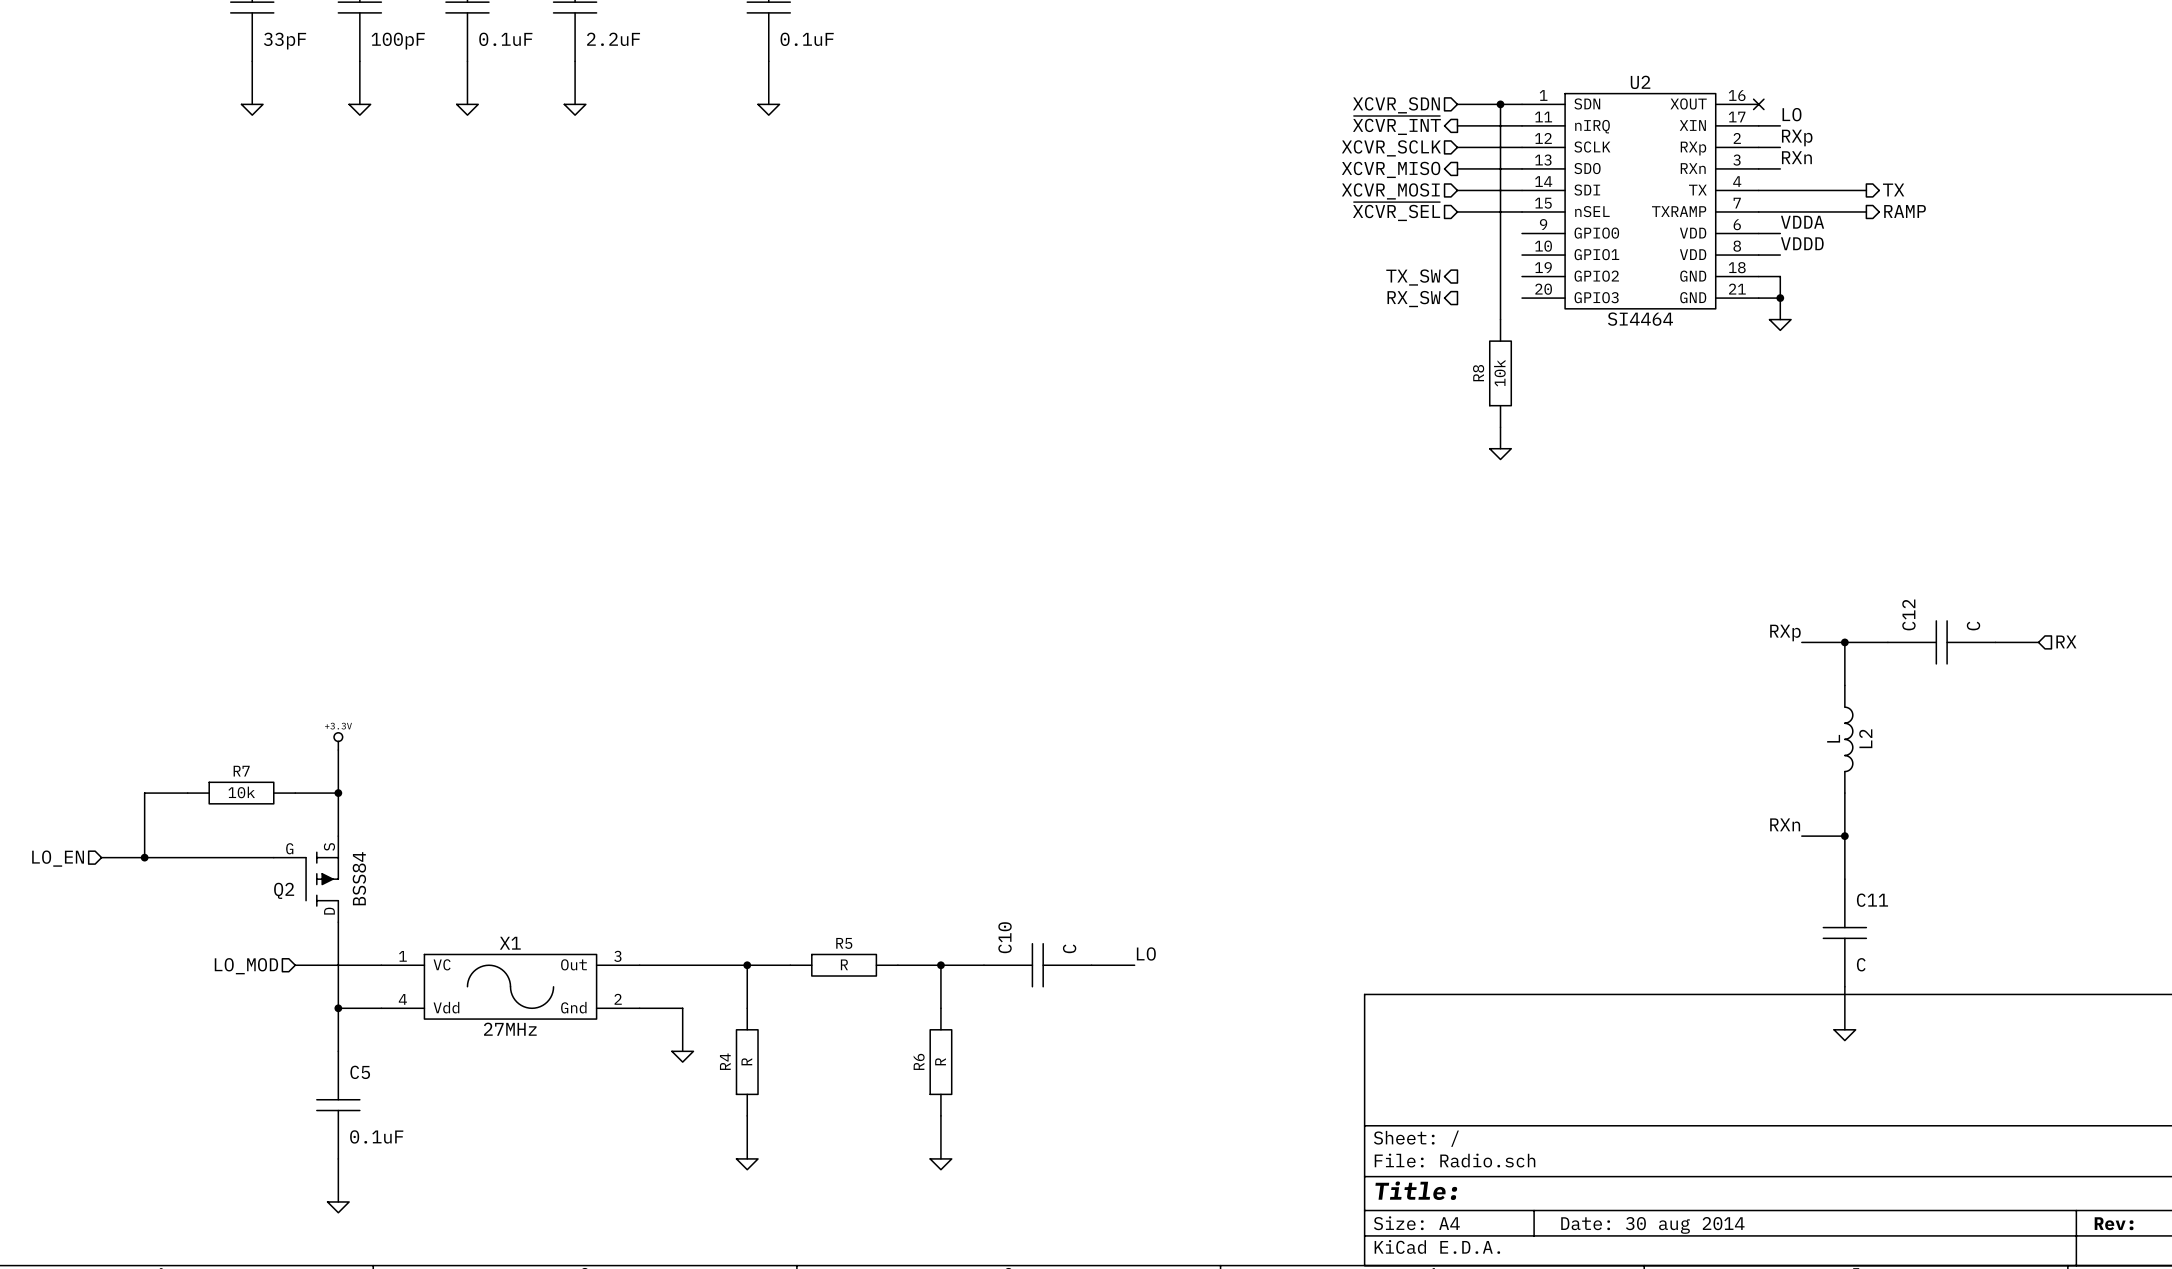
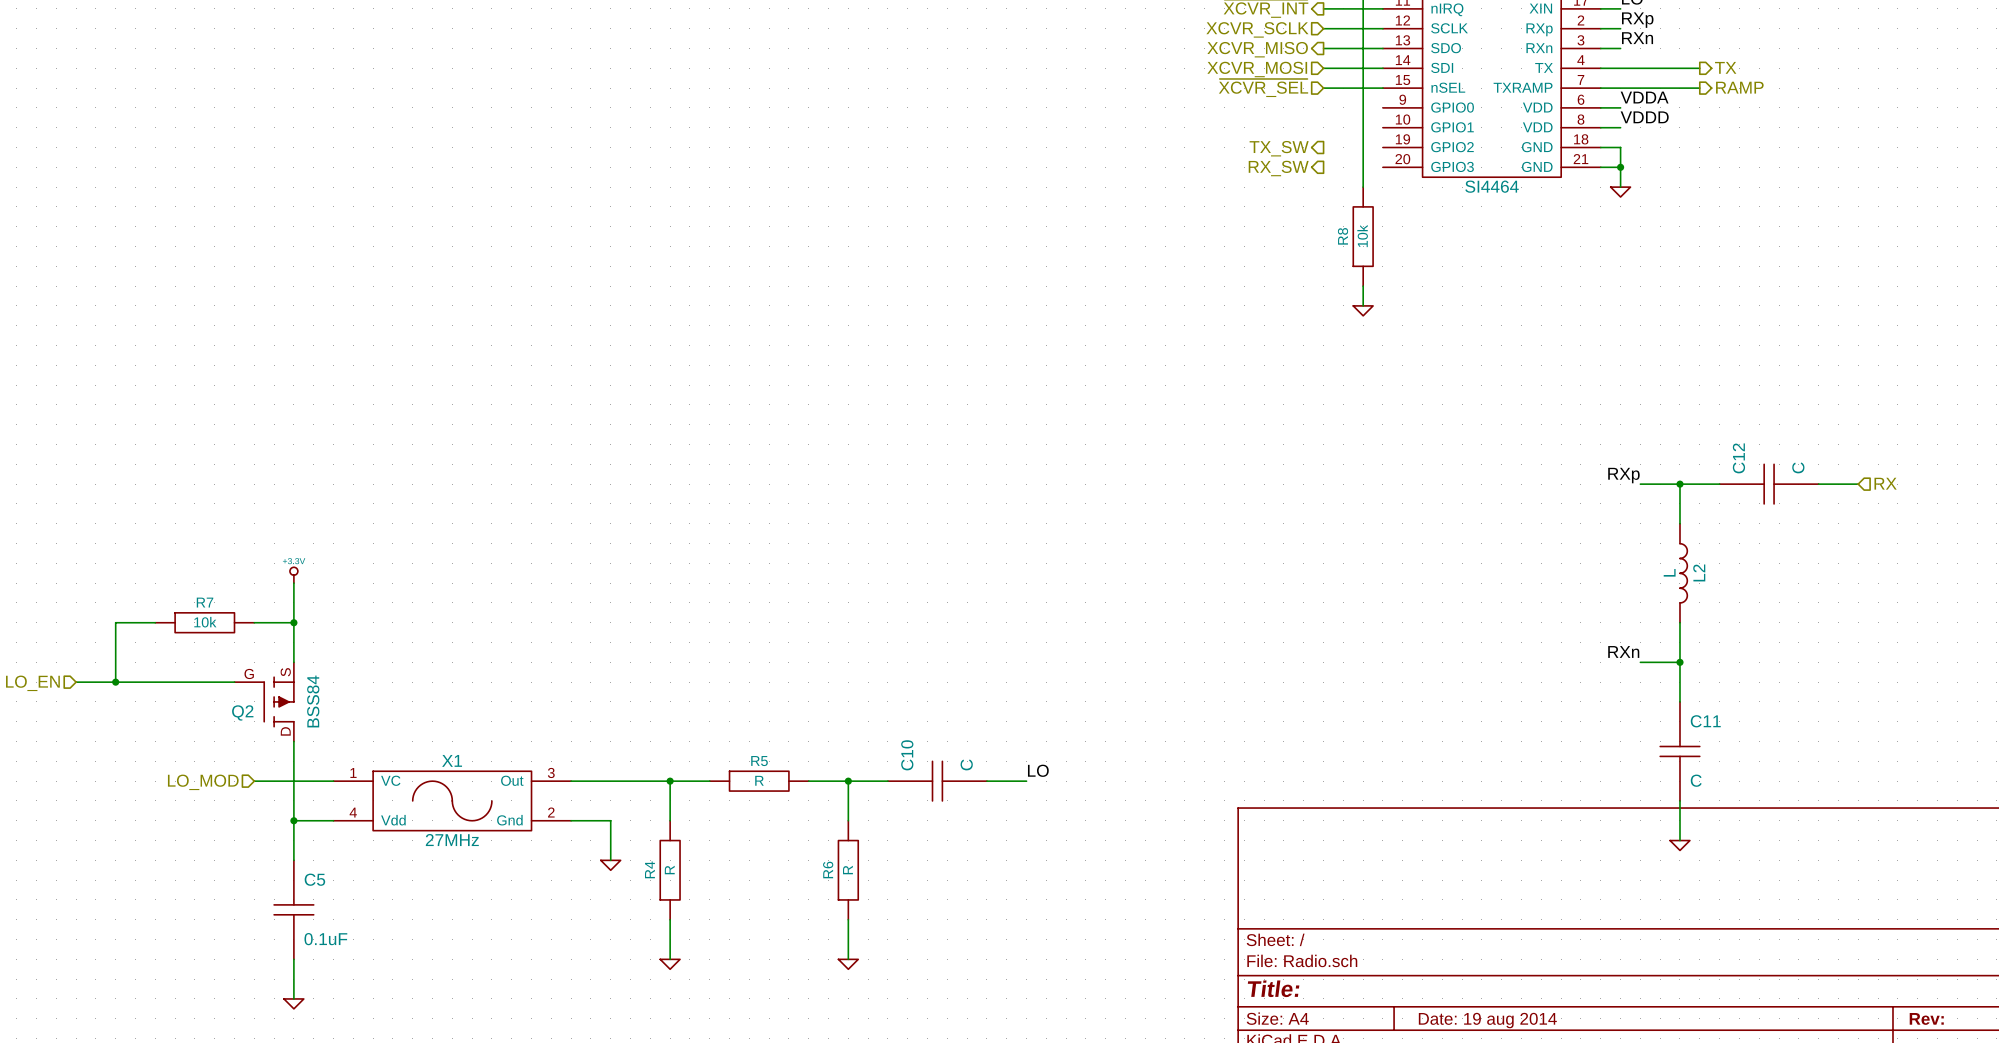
title block: Date: 30 aug 2014 (1652, 1225) -> Date: 19 aug 2014 (1487, 1020)

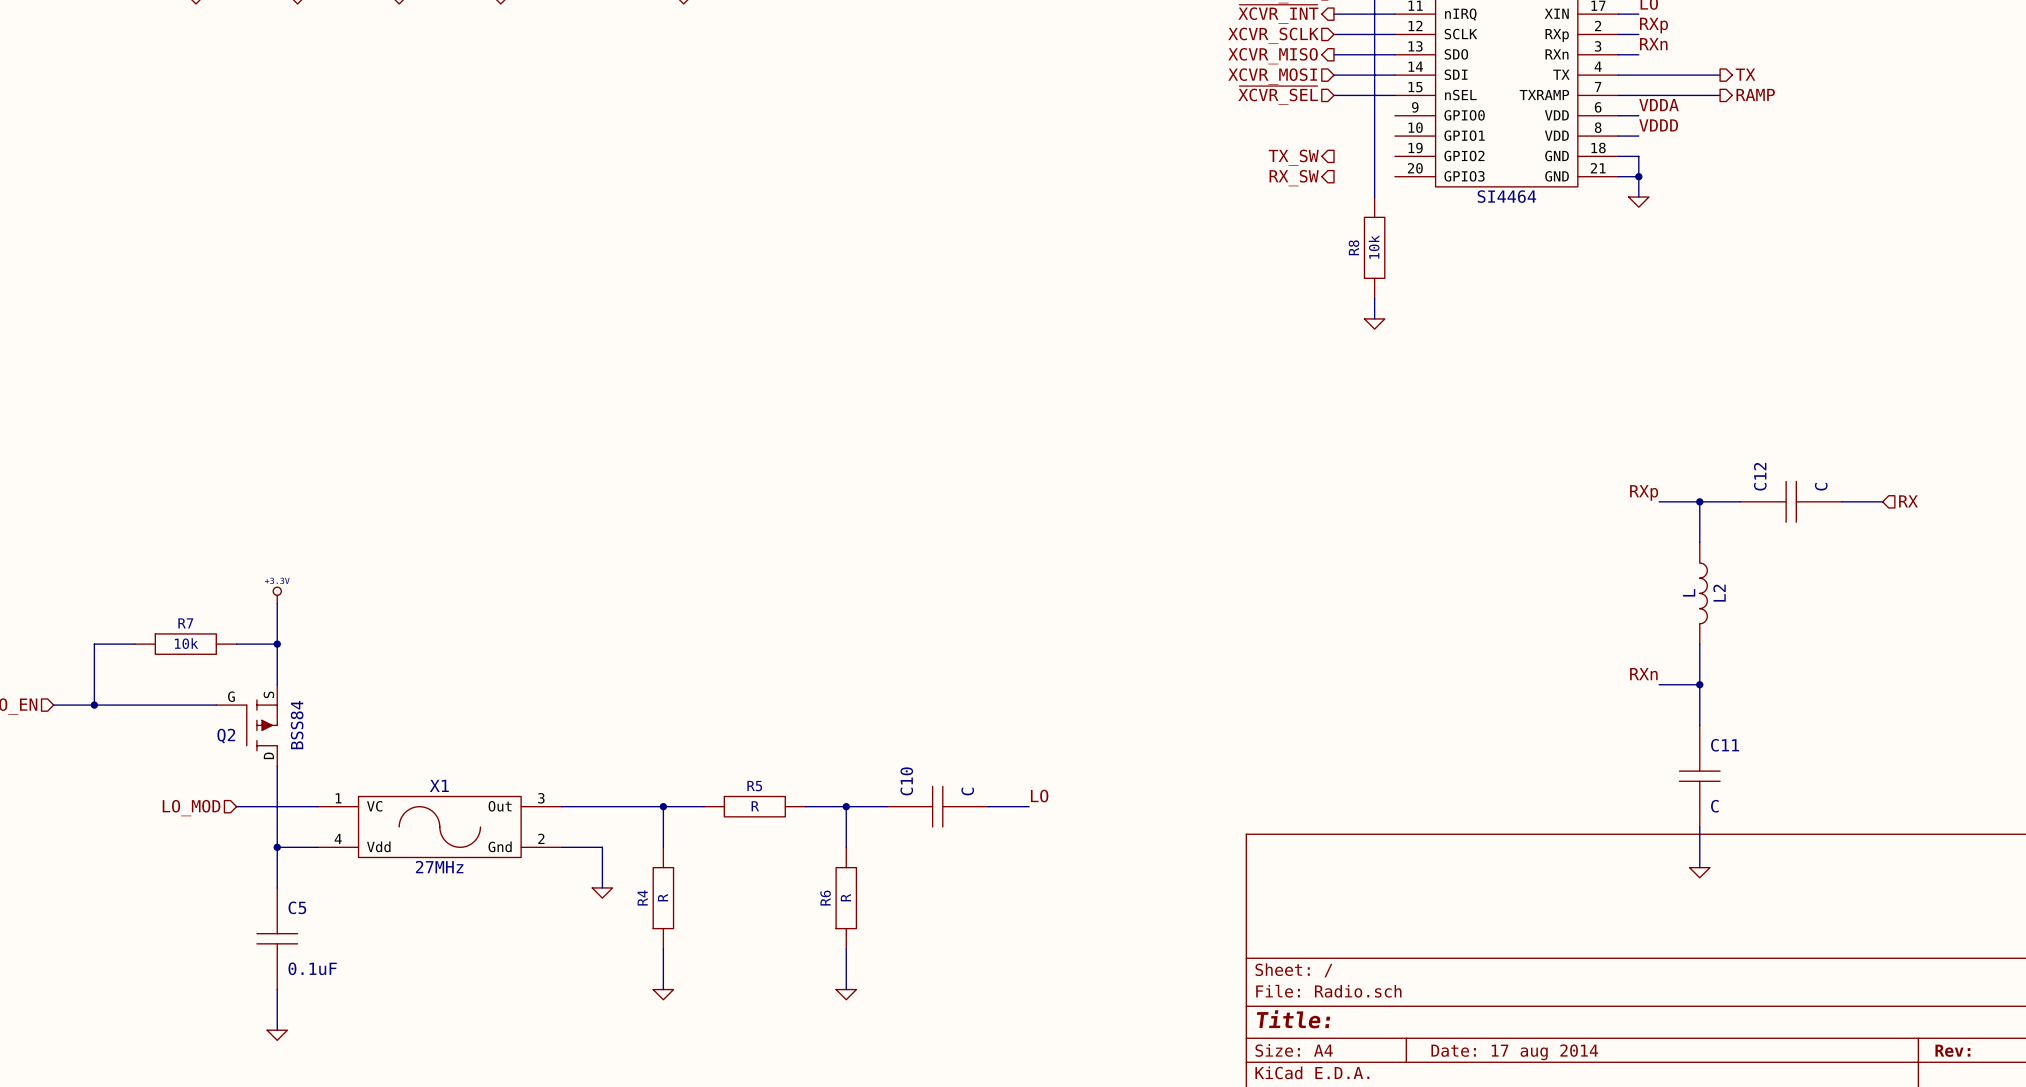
title block: Date: 19 aug 2014 (1487, 1020) -> Date: 17 aug 2014 (1514, 1052)

